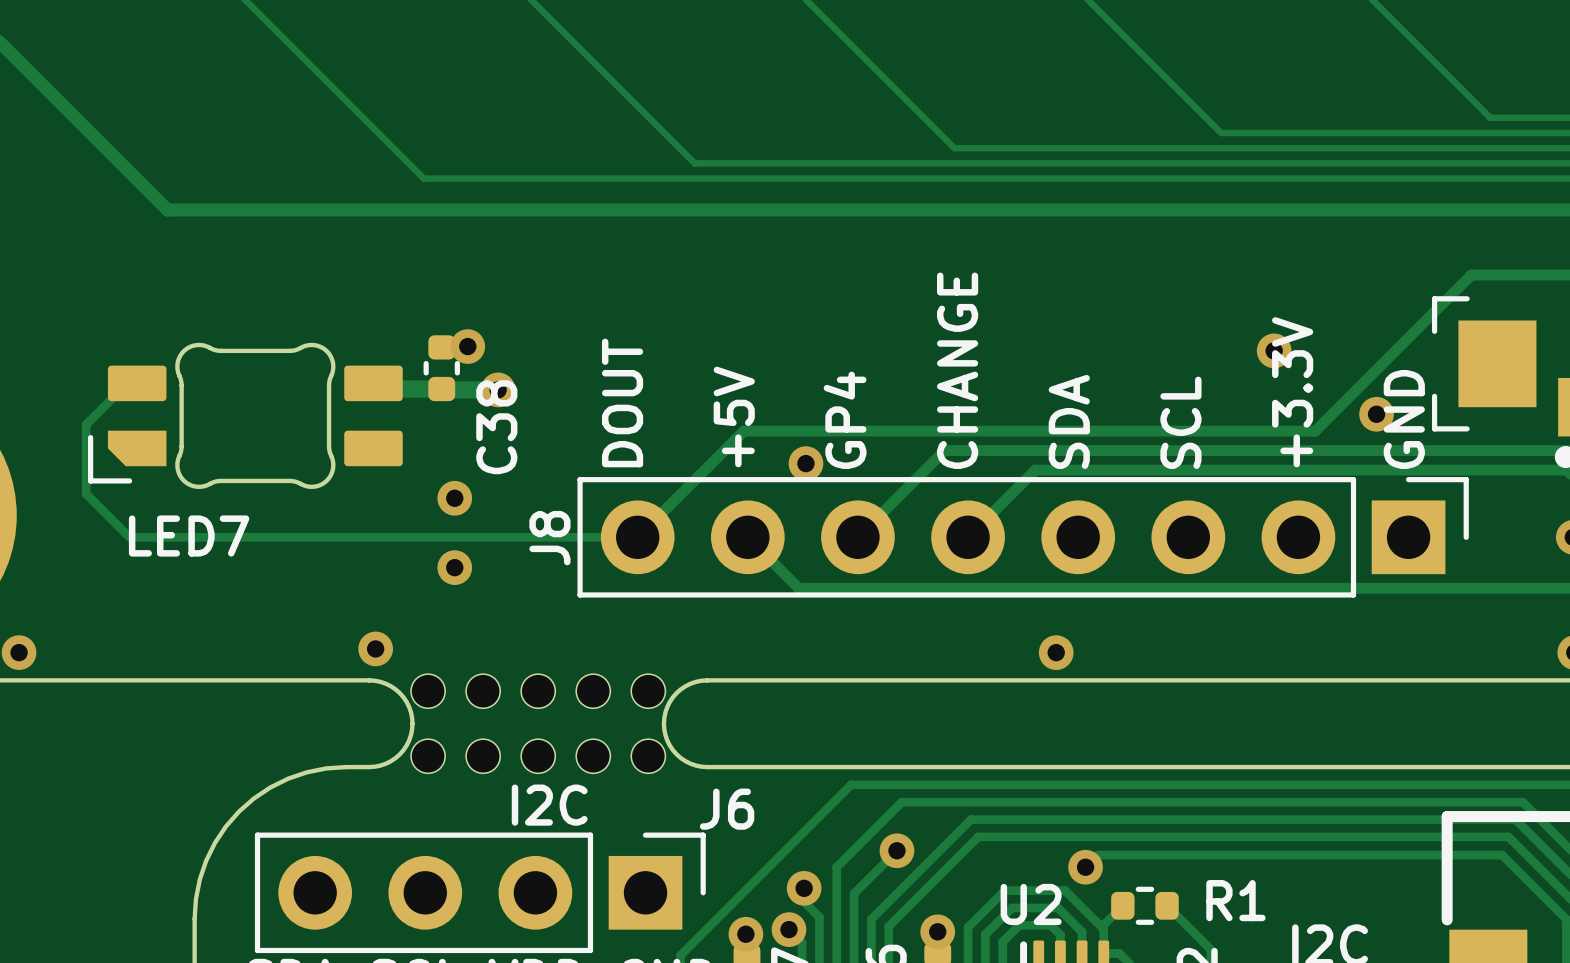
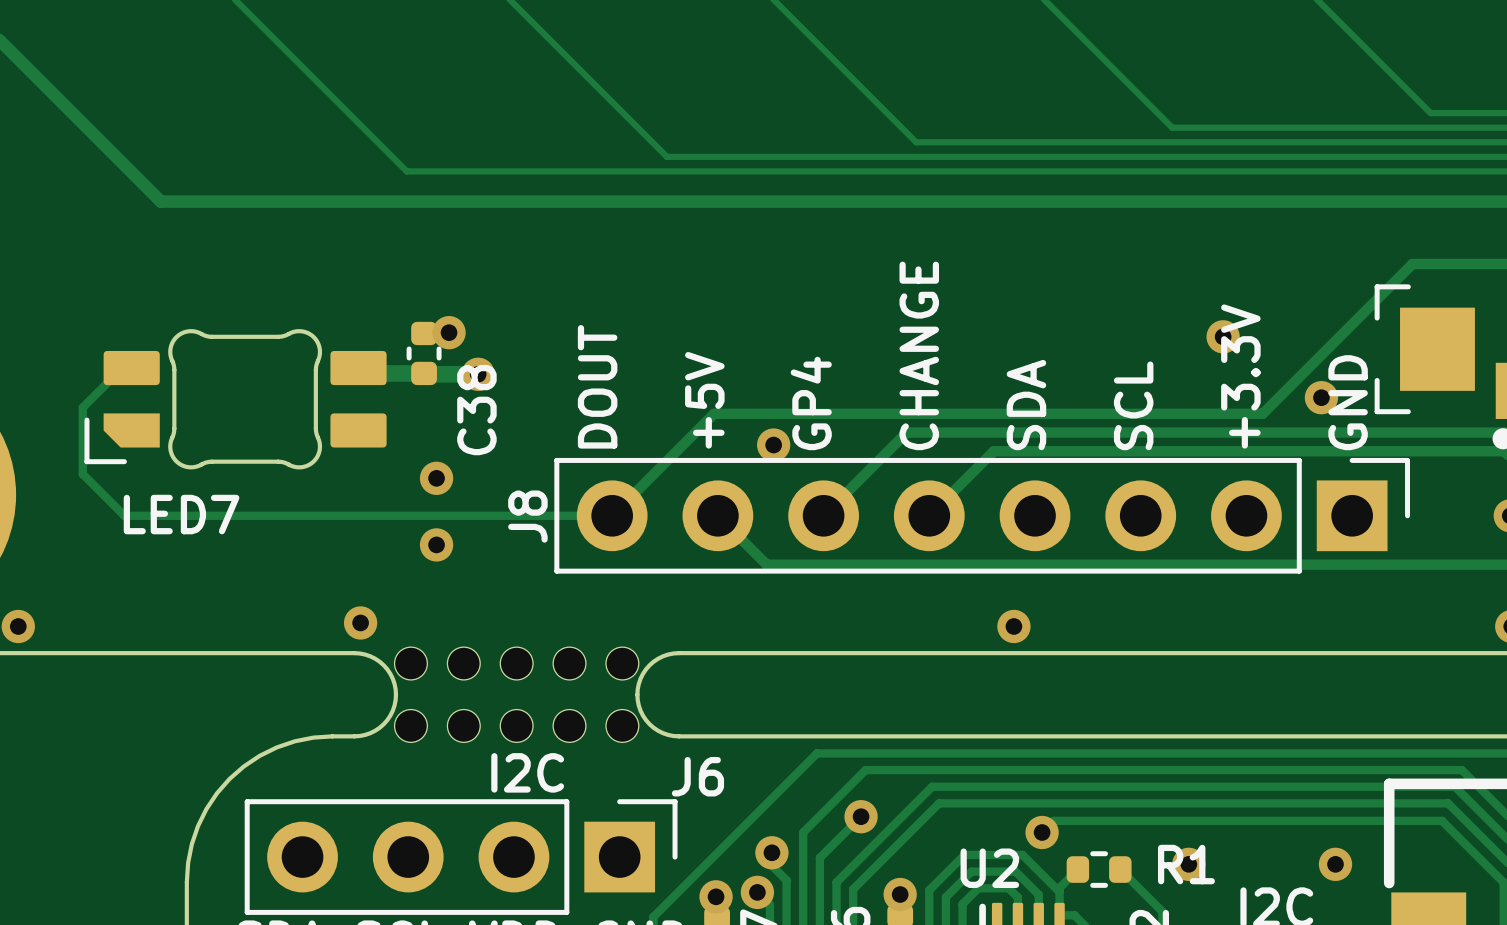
via: none -> (1188, 864)
via: none -> (1335, 864)

